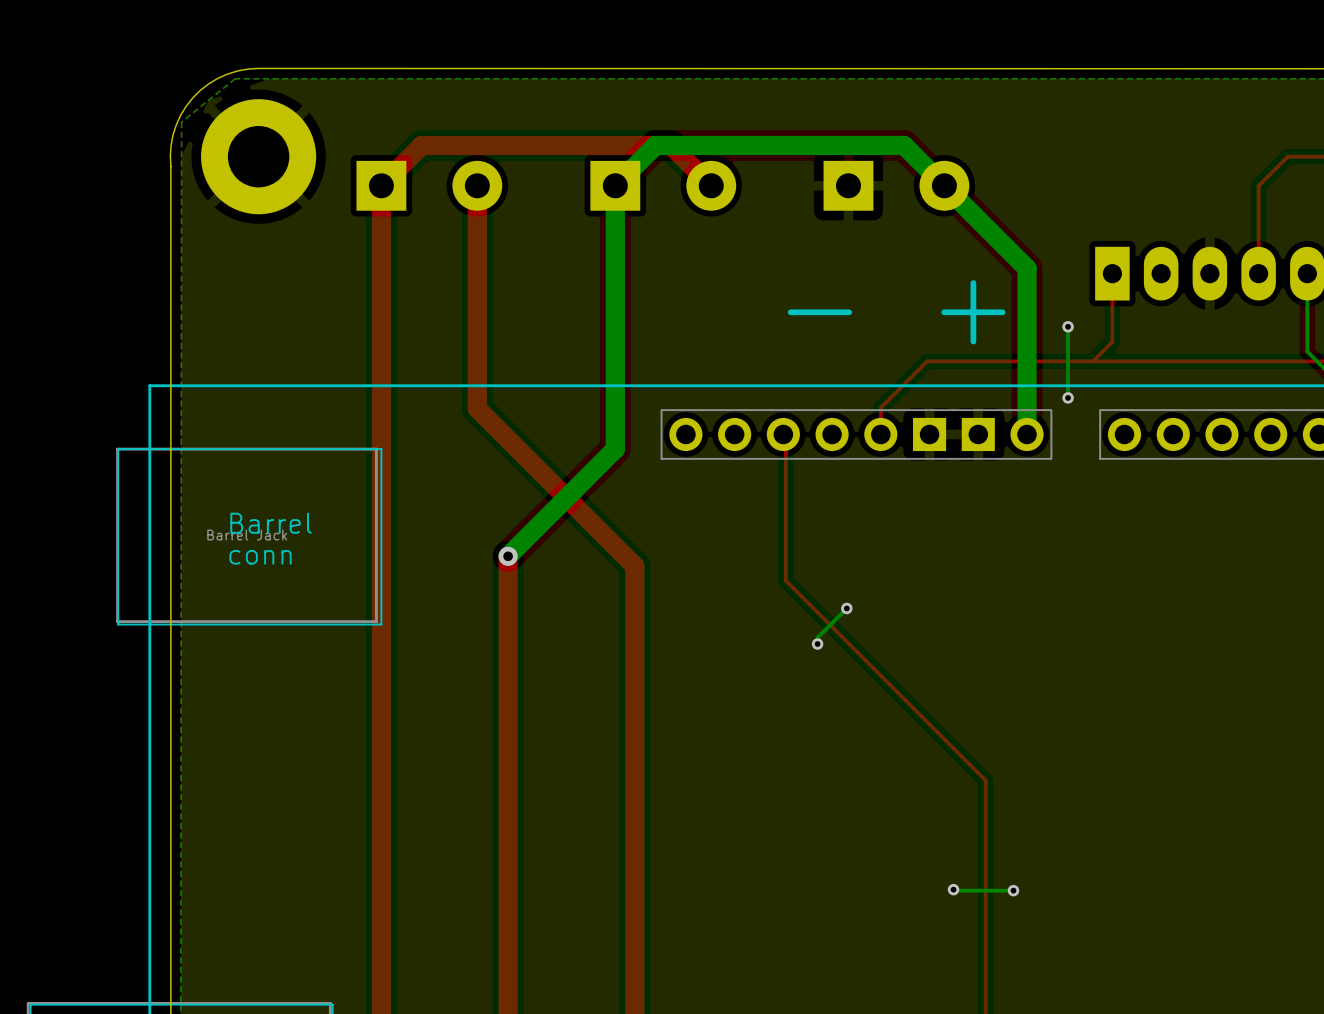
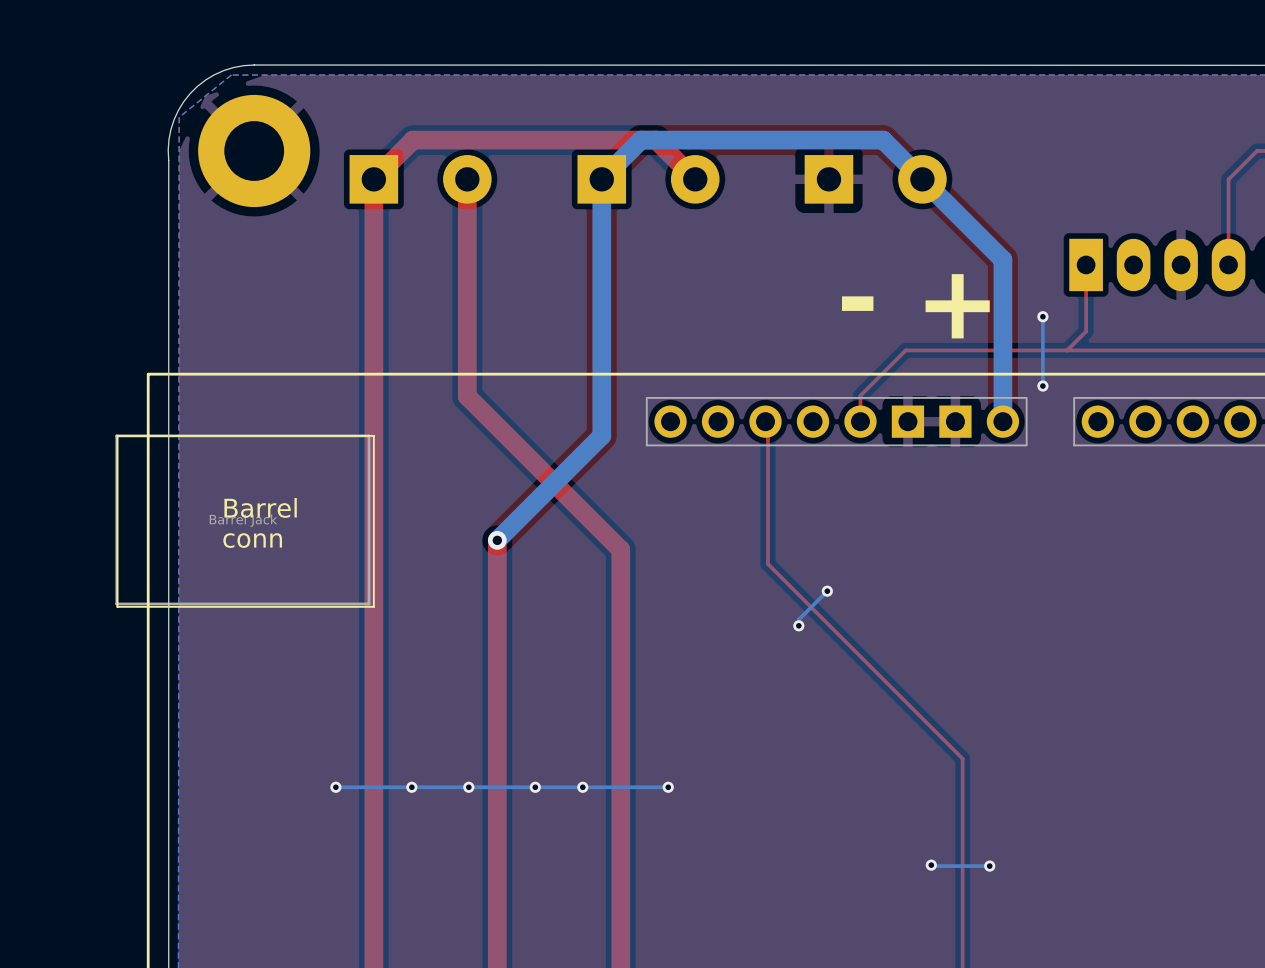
via: none -> (335, 787)
via: none -> (411, 787)
via: none -> (468, 787)
via: none -> (535, 787)
via: none -> (582, 787)
bottom track: none -> (668, 787) (335, 787)
via: none -> (668, 787)

